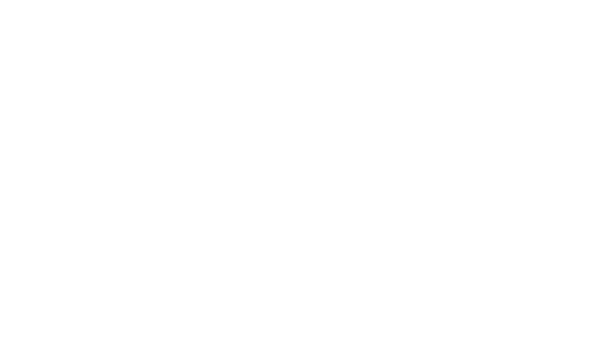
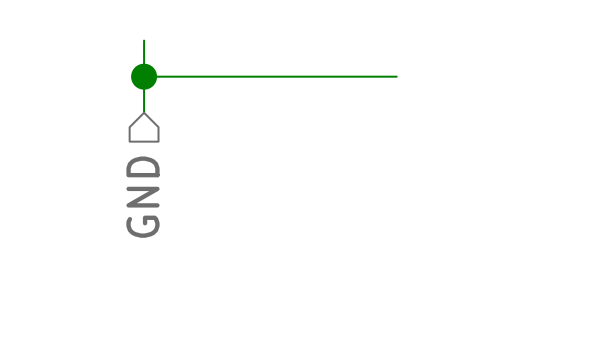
wire: none -> (144, 40) (144, 112)
wire: none -> (144, 76) (396, 76)
junction: none -> (144, 76)
hierarchical label: none -> GND (142, 197)

